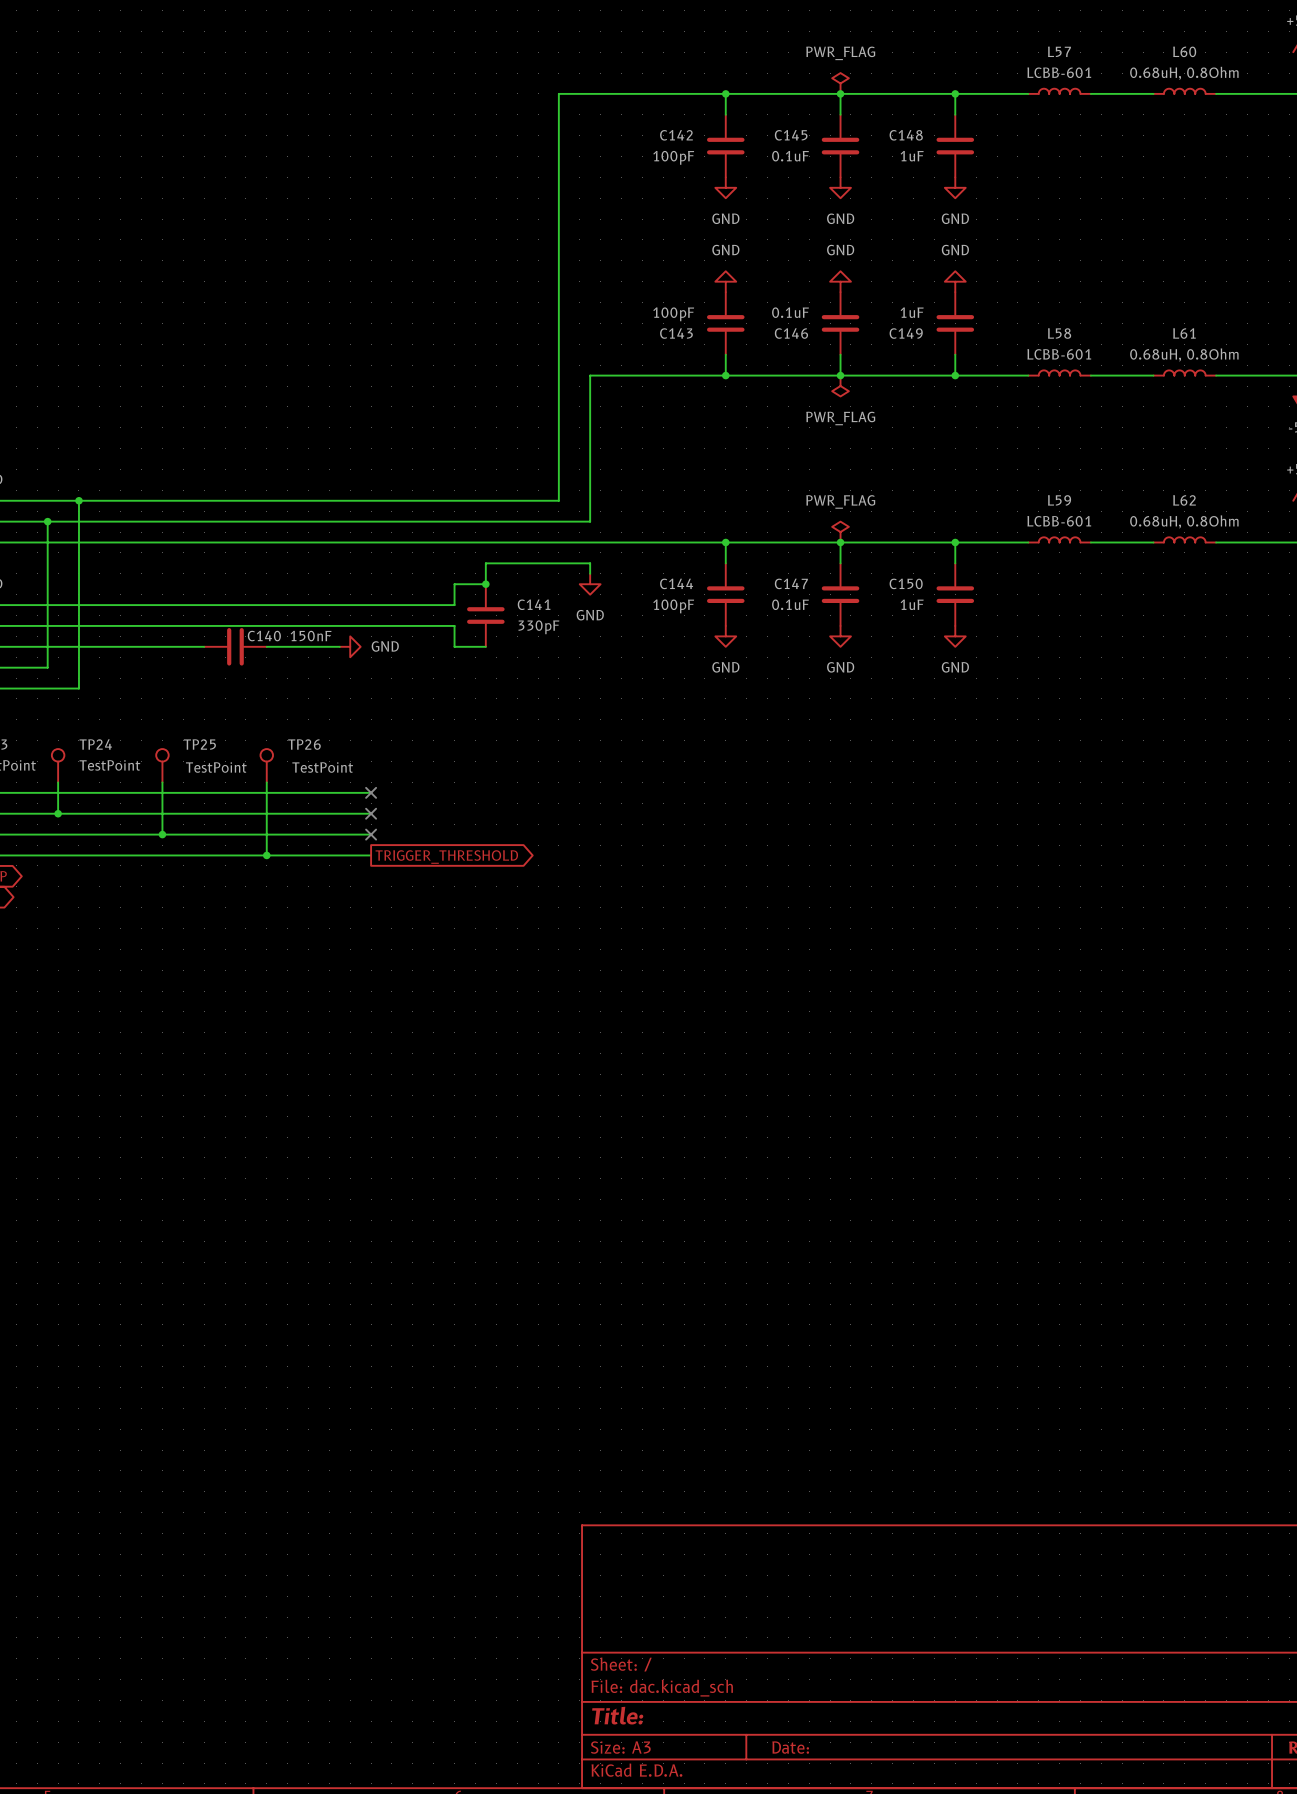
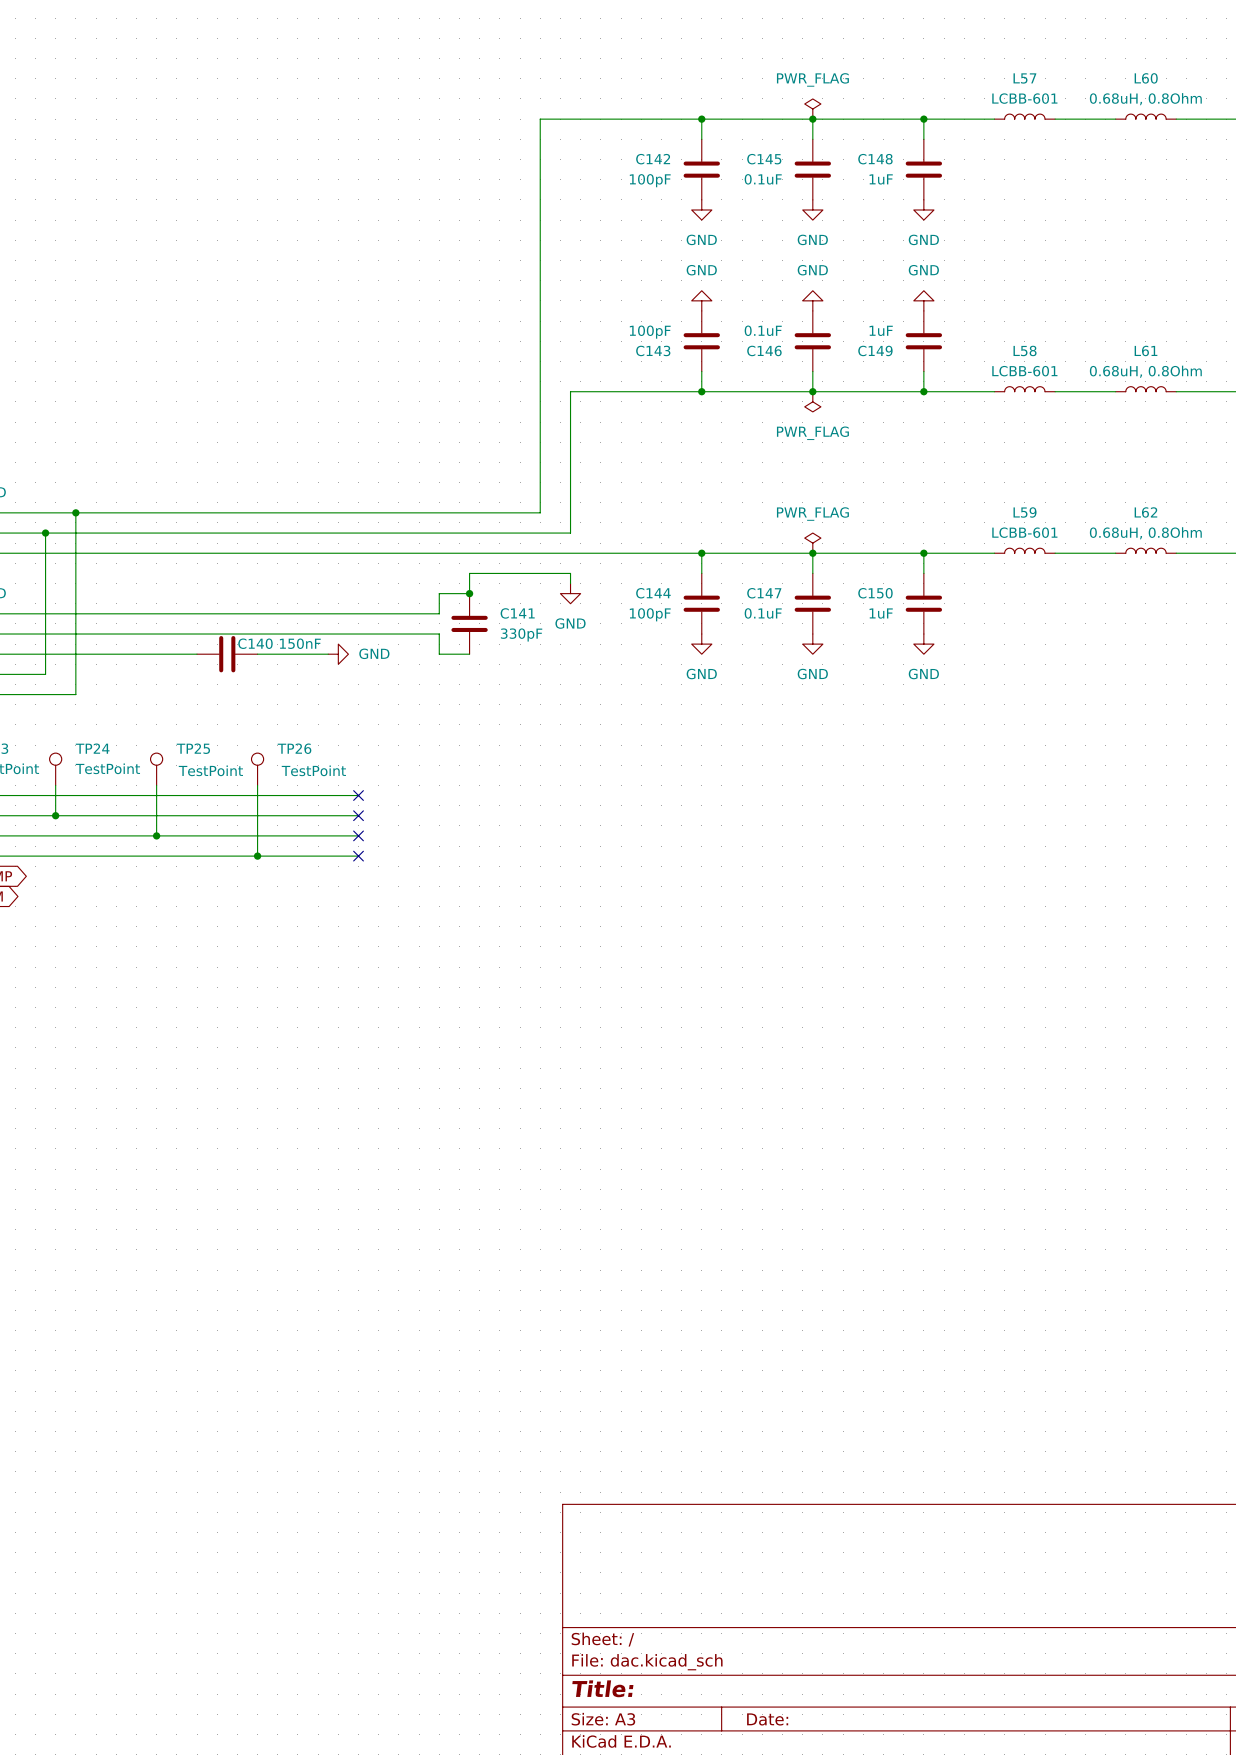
no-connect mark: none -> (358, 856)
global label: TRIGGER_THRESHOLD (446, 857) -> none

